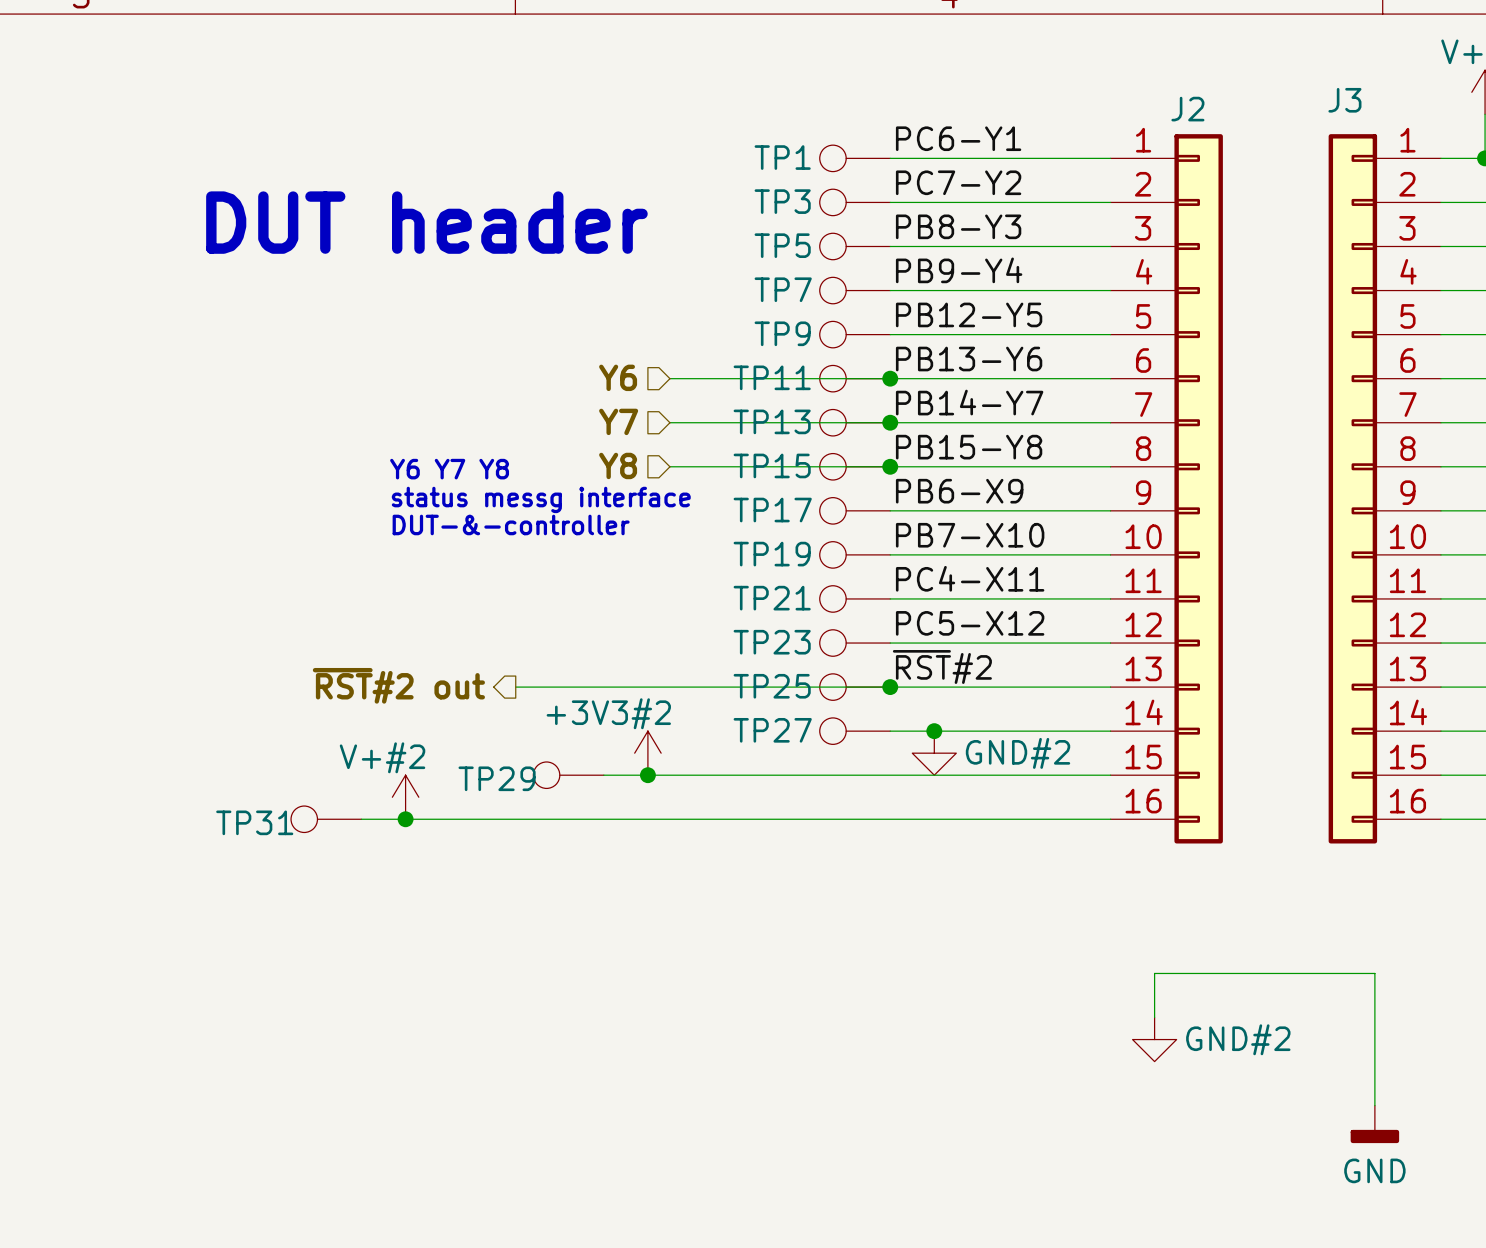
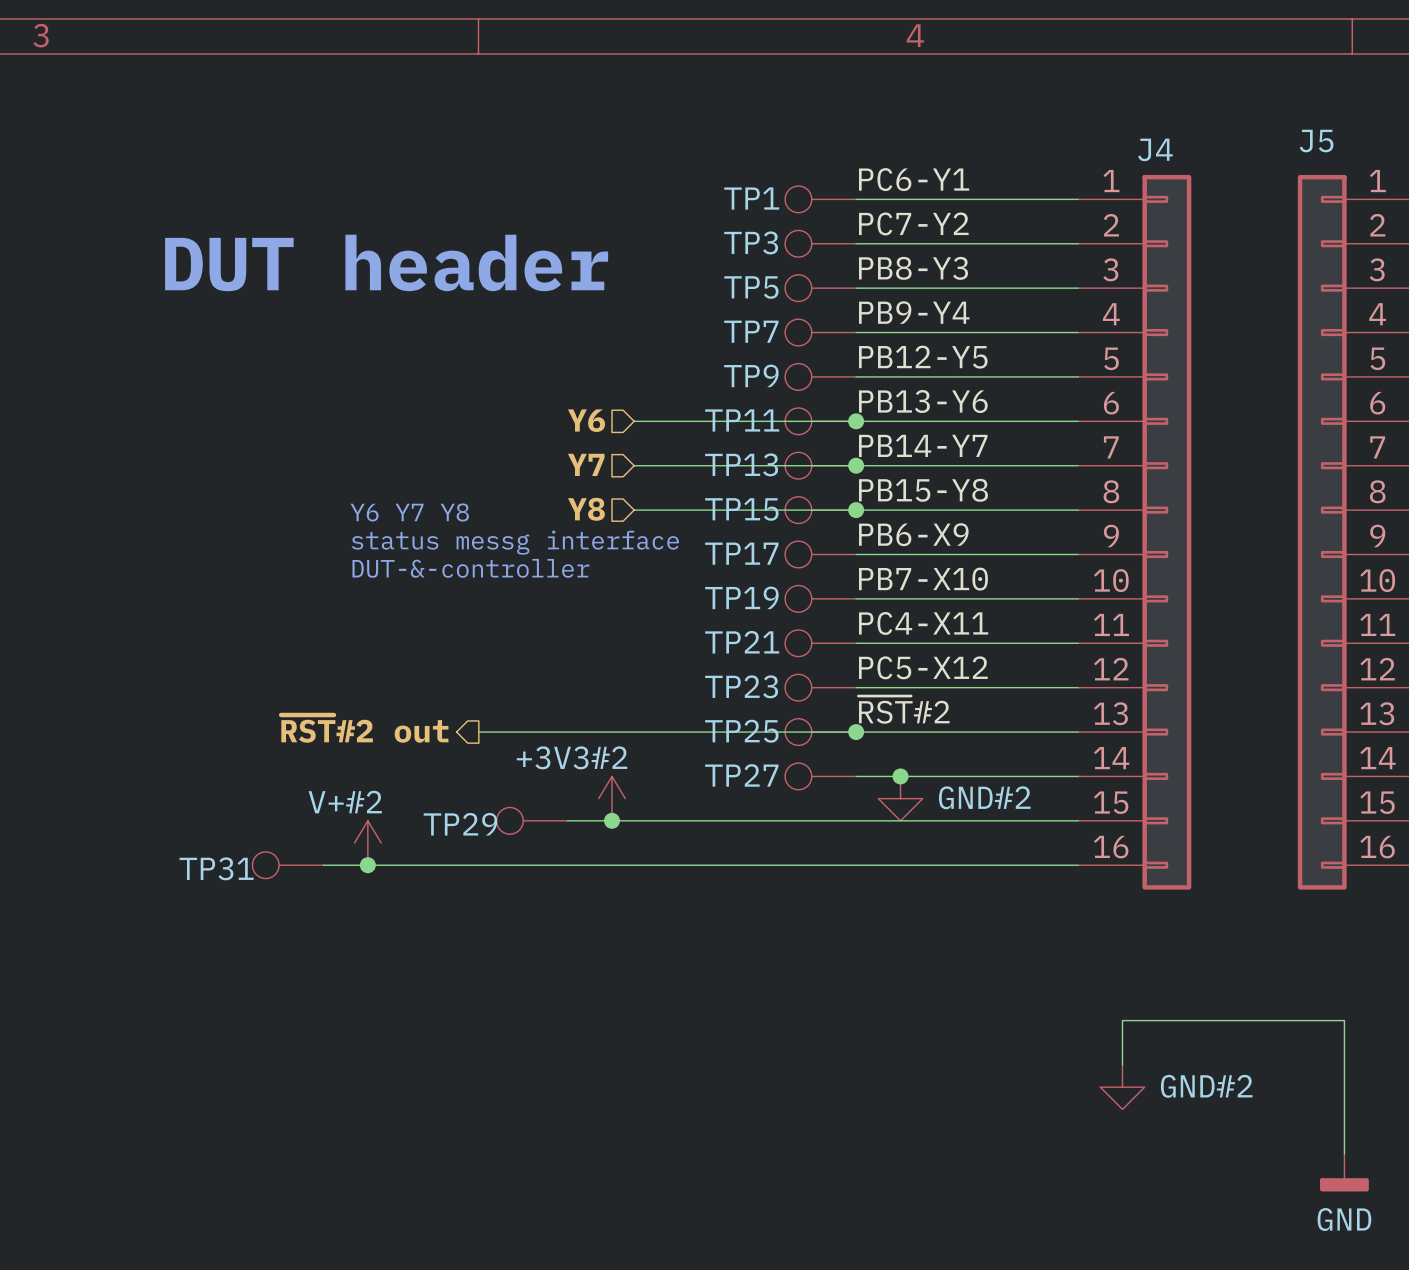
J3 name: J3 (1344, 100) -> J5 (1316, 141)
J2 name: J2 (1187, 109) -> J4 (1155, 149)

